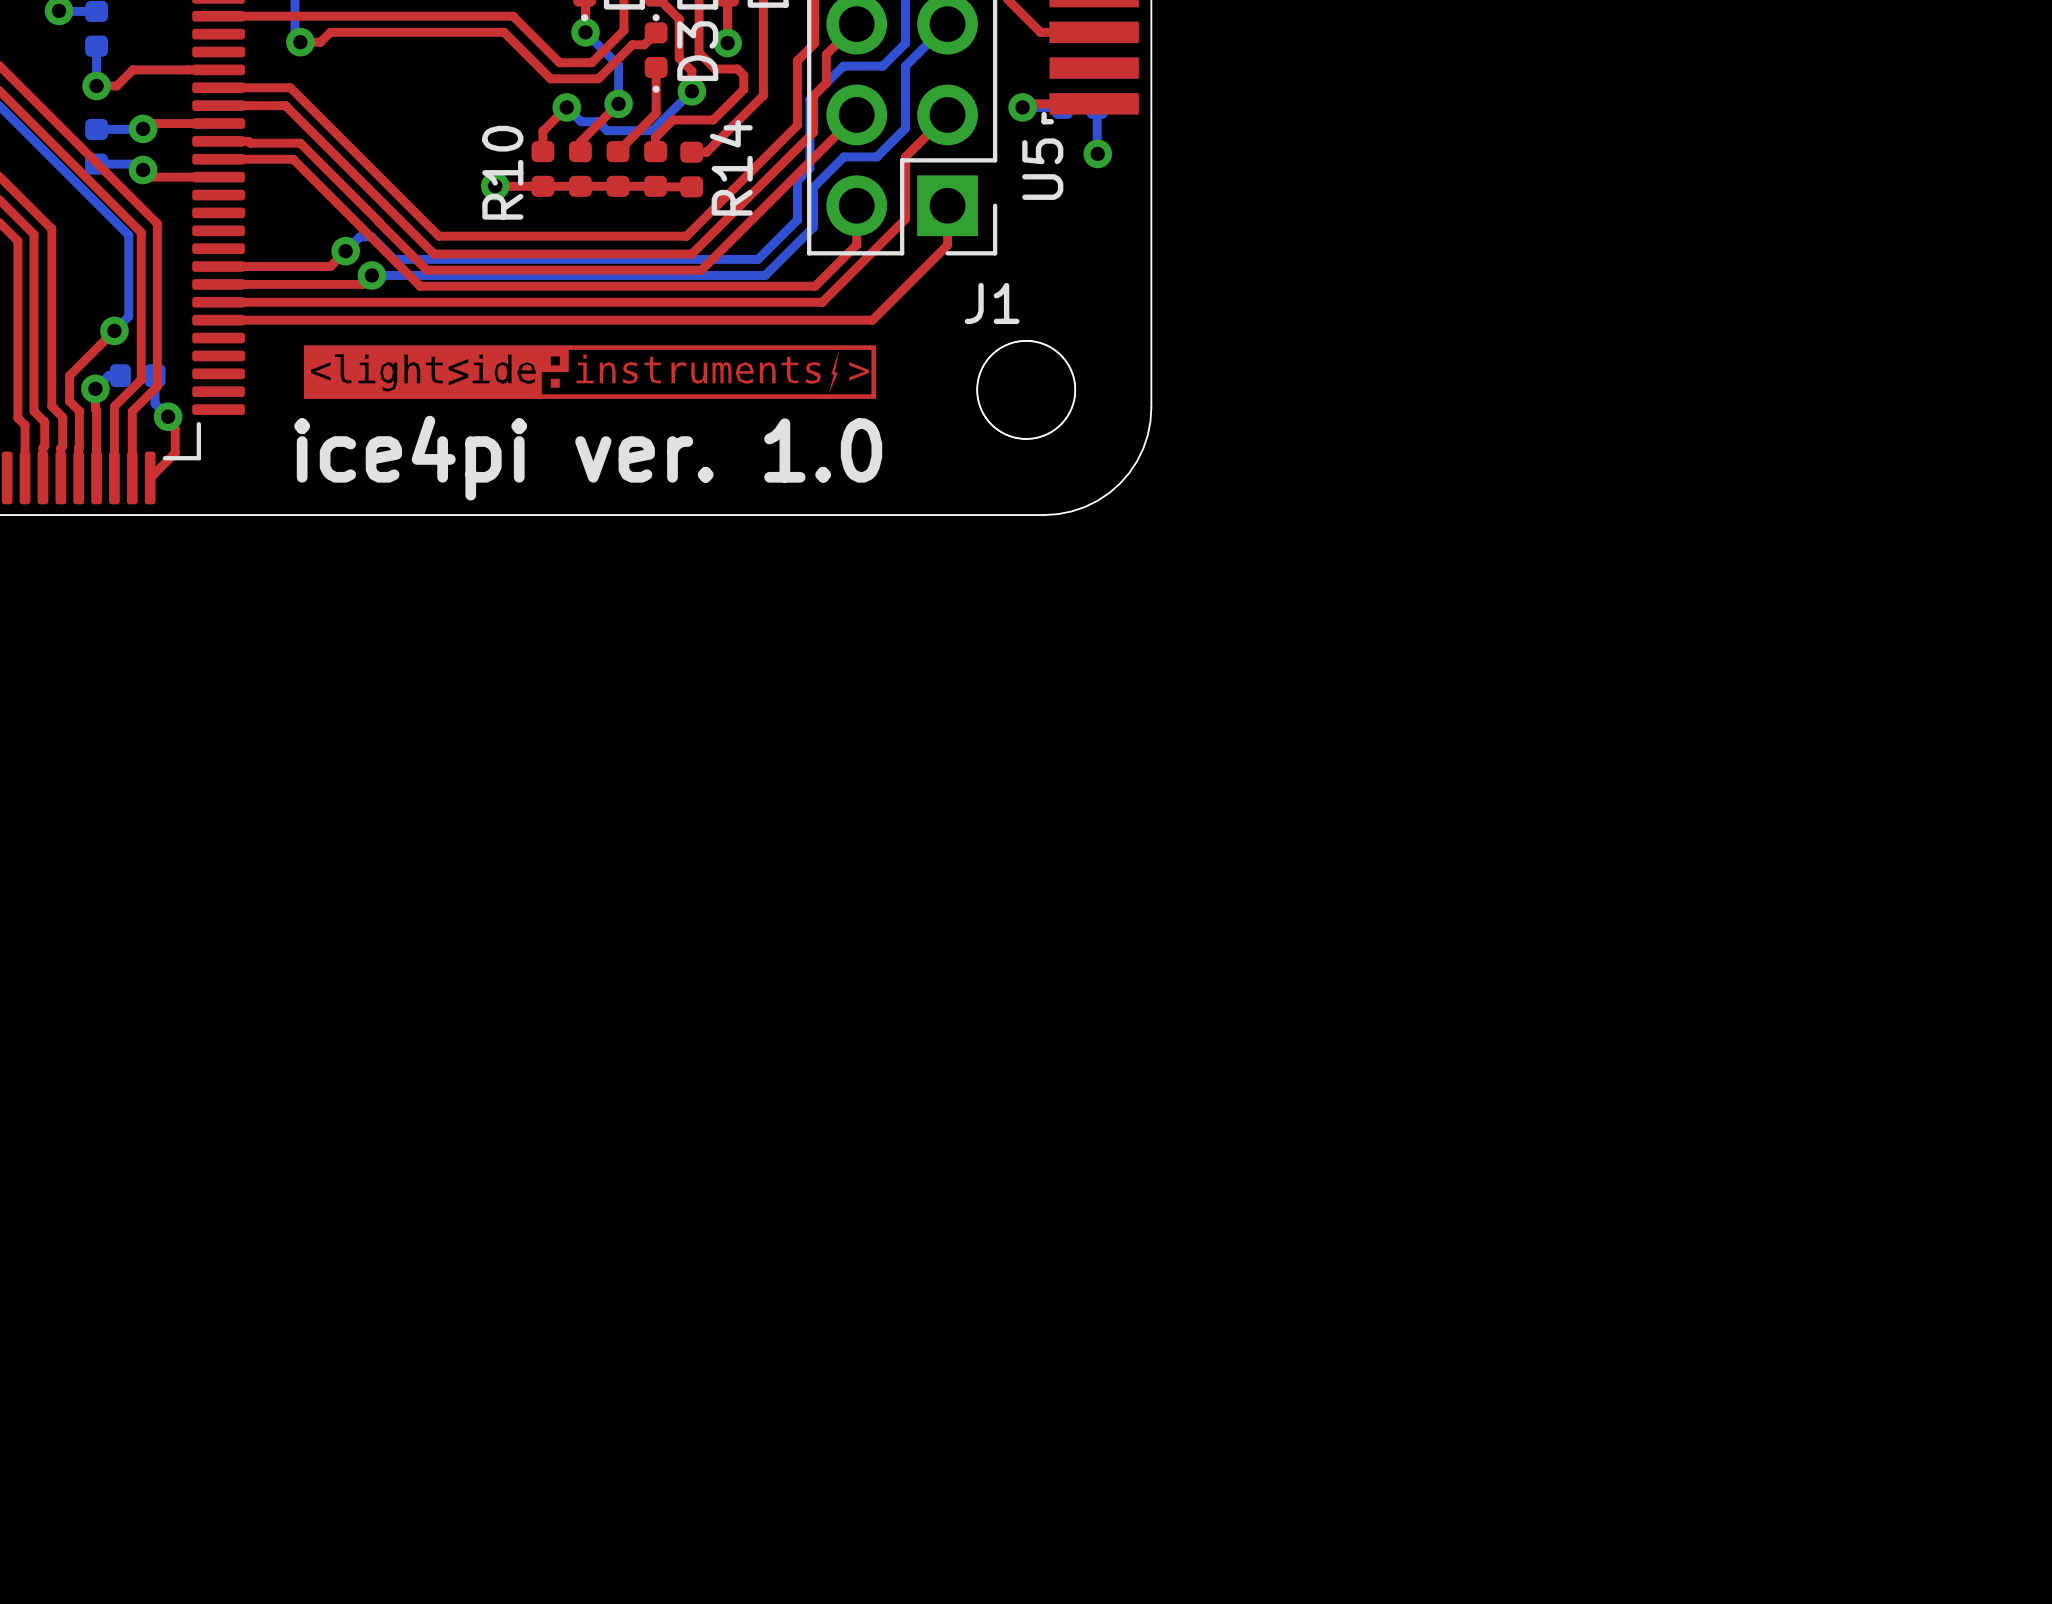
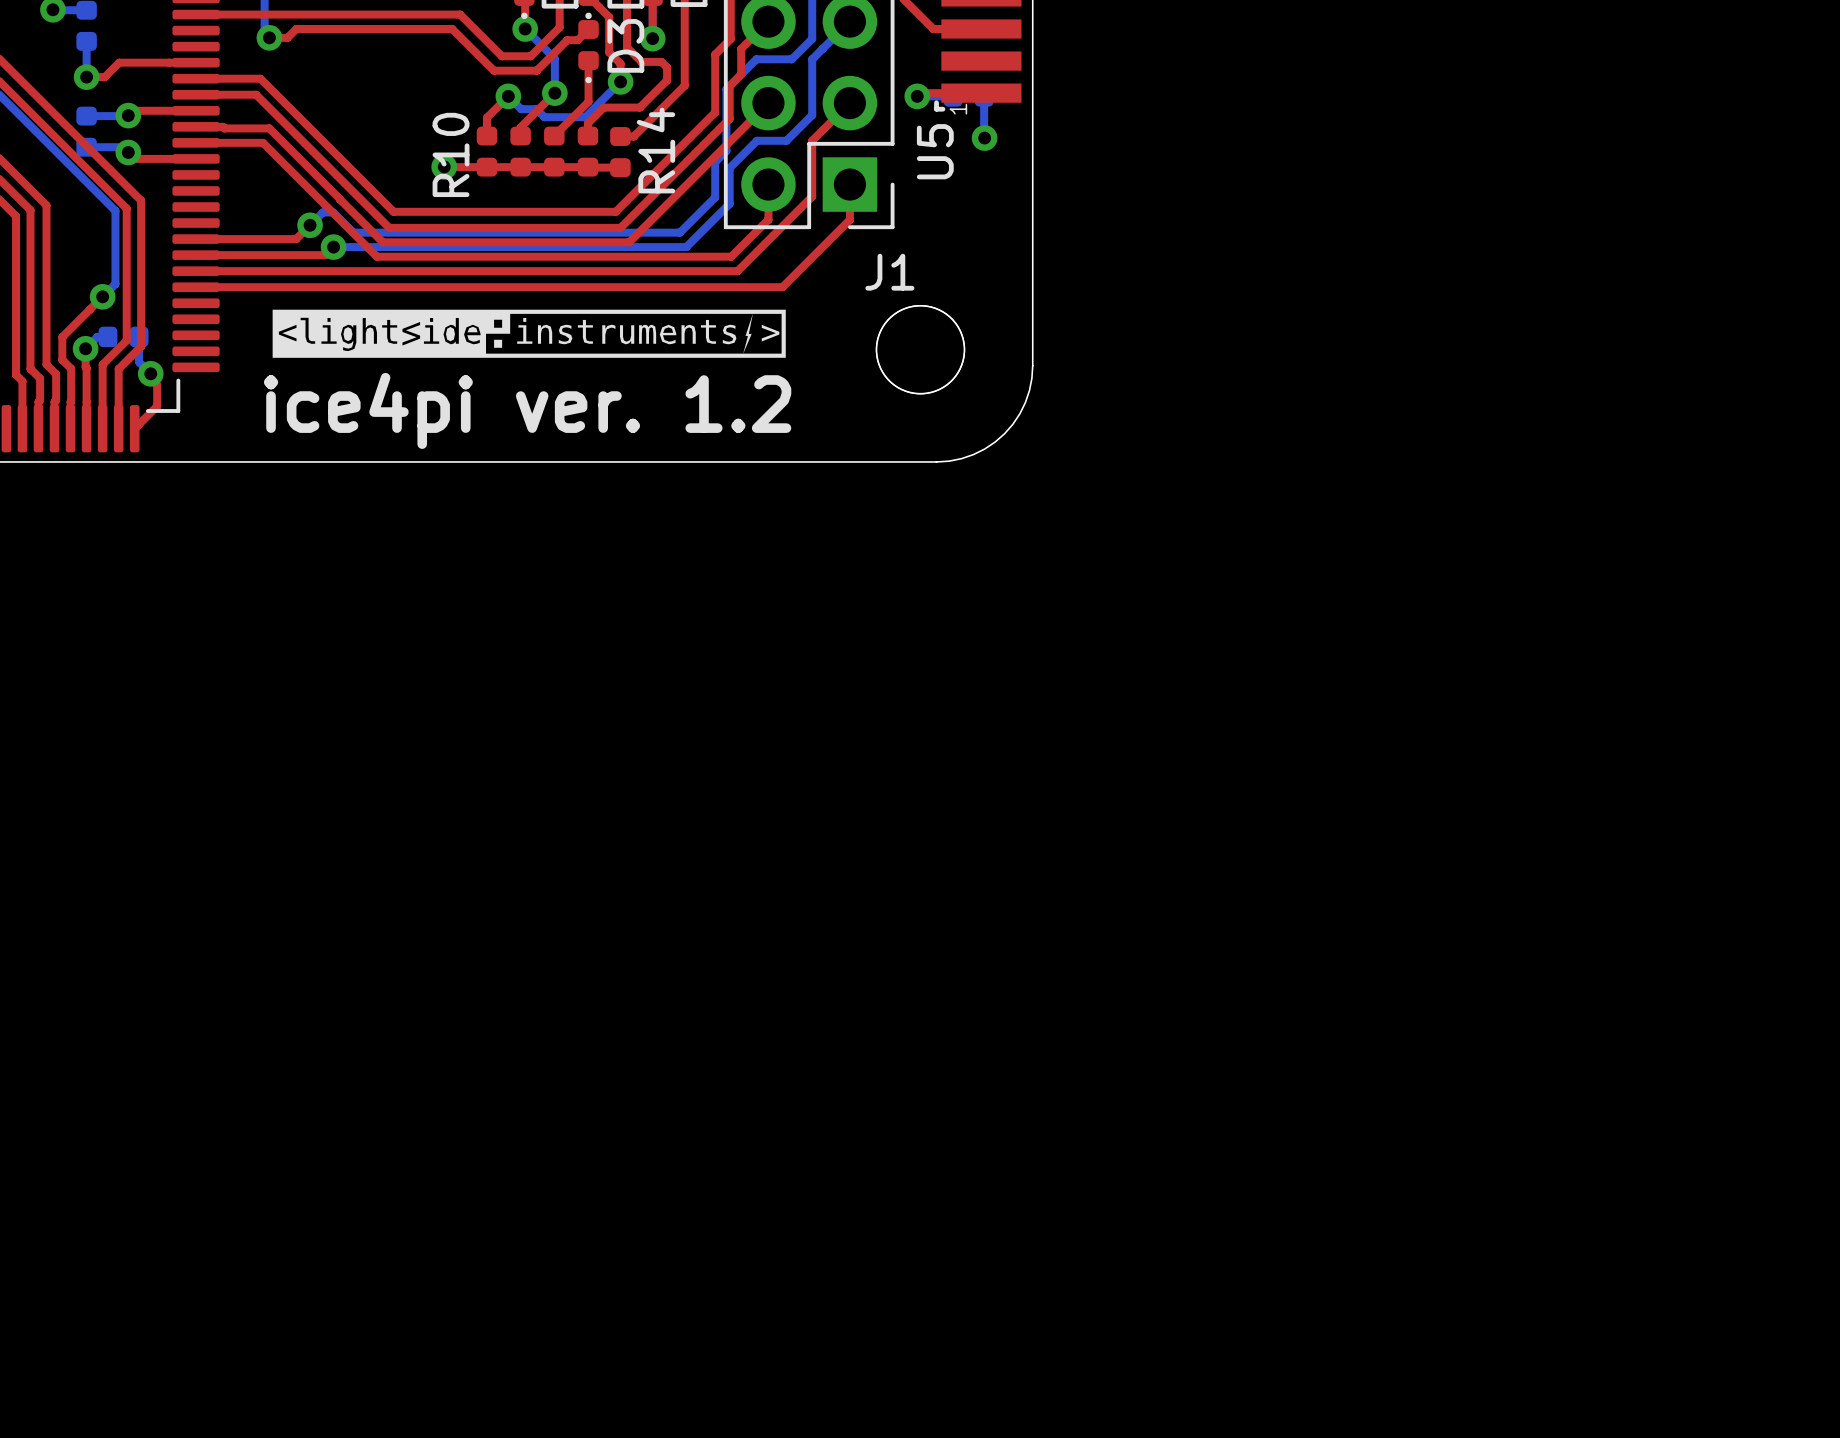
U5 text: none -> 1 (958, 109)
drawing shape: [303, 345, 877, 399] -> [272, 309, 786, 358]
text: ice4pi ver. 1.0 (588, 458) -> ice4pi ver. 1.2 (527, 410)

